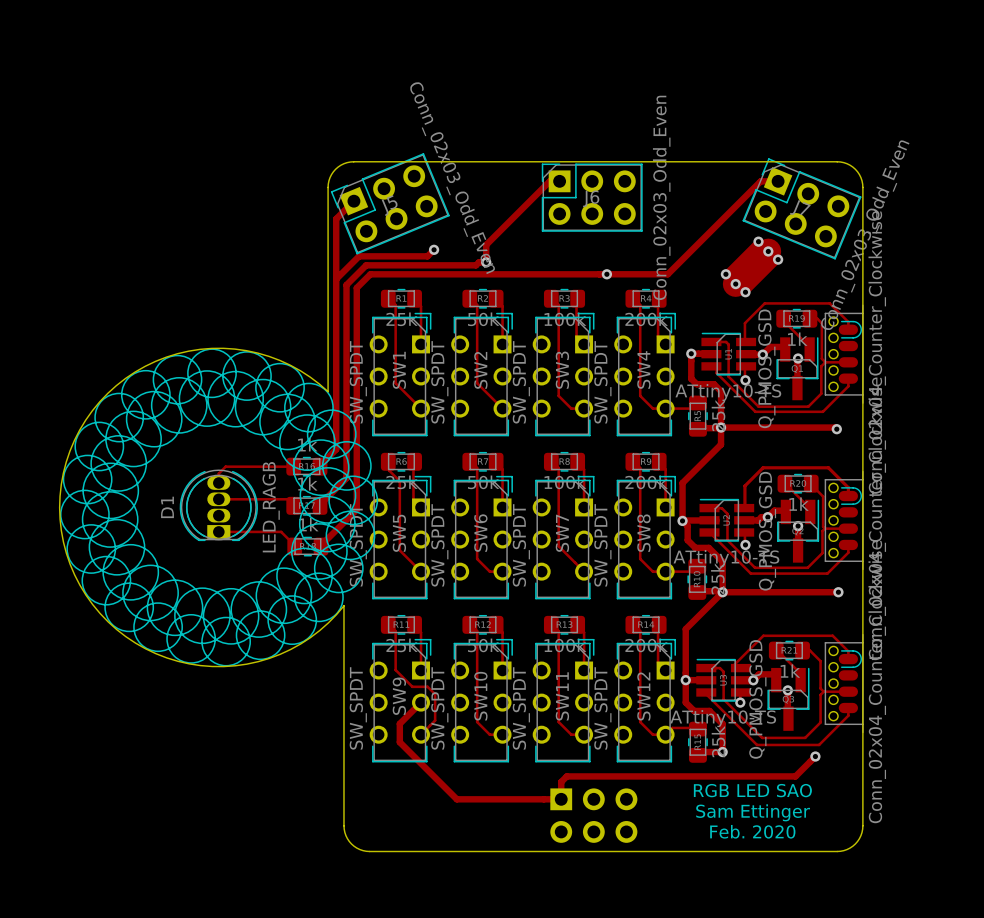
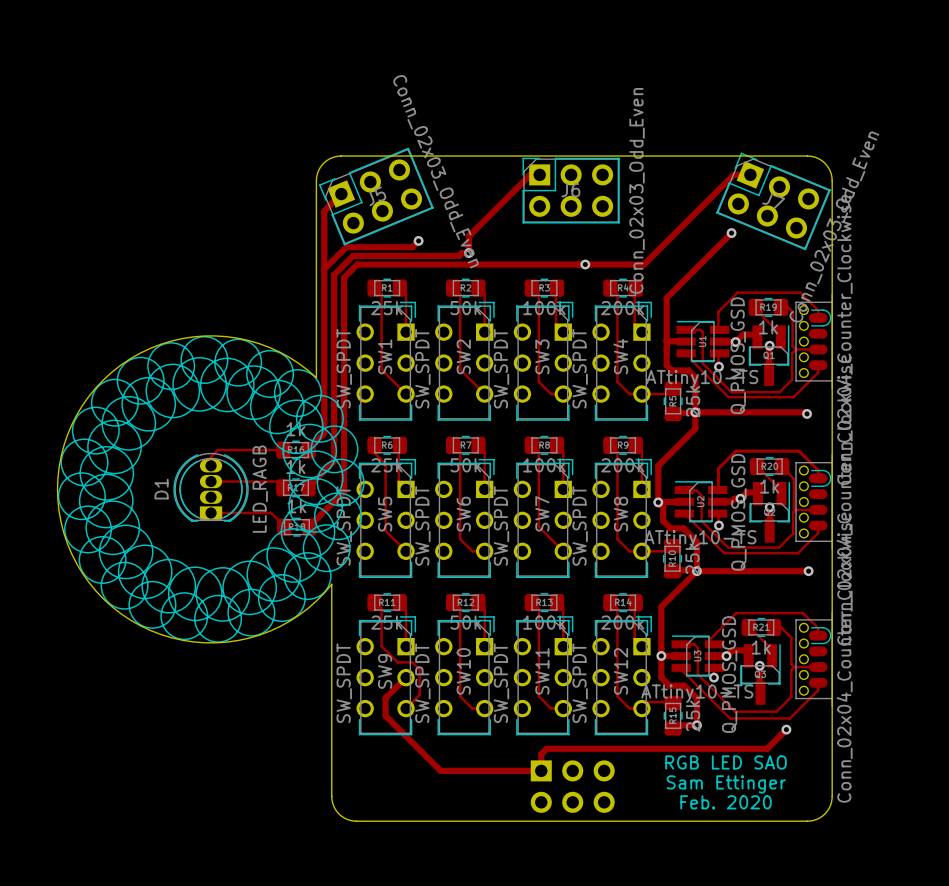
track: (768, 251) (735, 284) -> none
via: (768, 251) -> none
track: (778, 259) (745, 292) -> none
via: (778, 259) -> none
track: none -> (700, 264) (666, 297) (666, 341)
via: (725, 274) -> none
via: (735, 284) -> none
via: (745, 292) -> none
via: (691, 353) -> none

